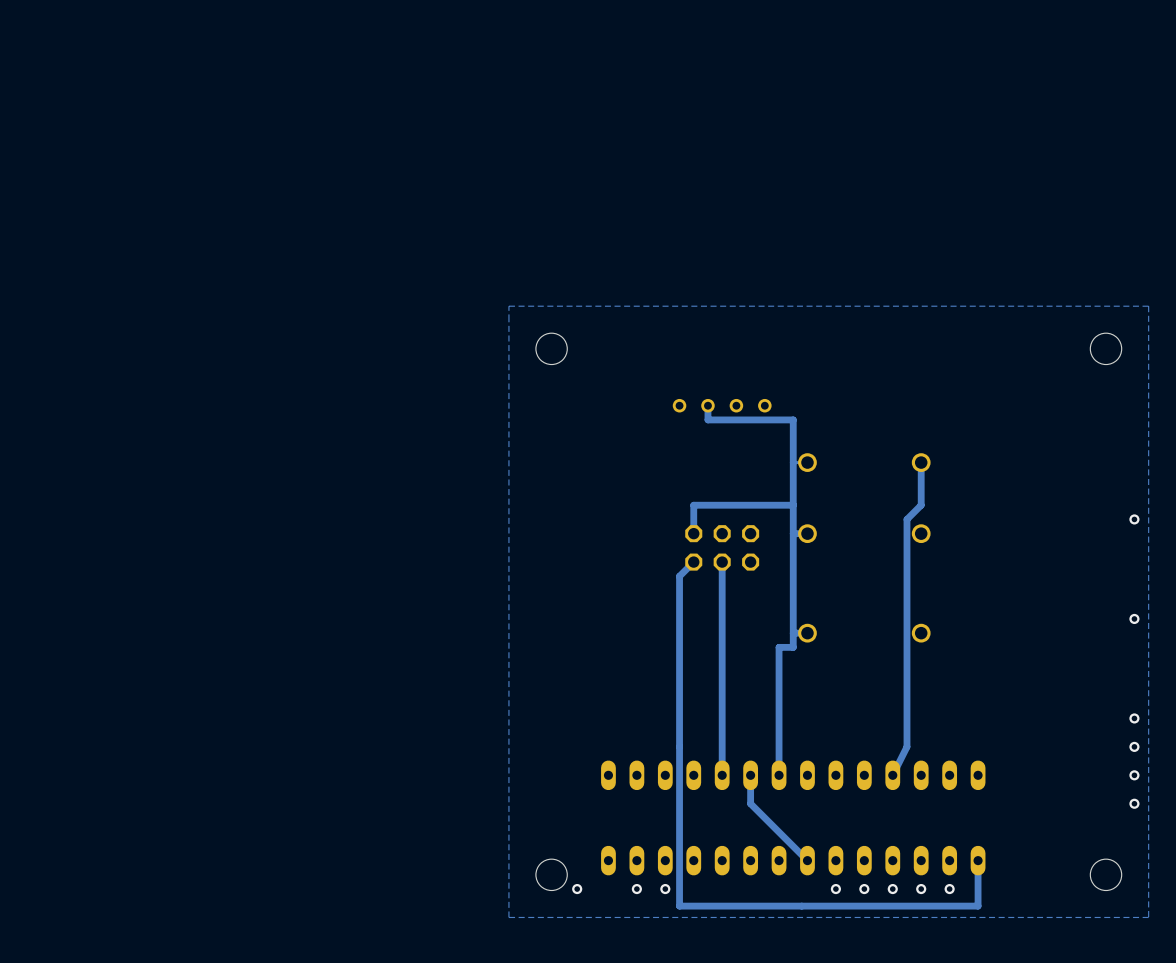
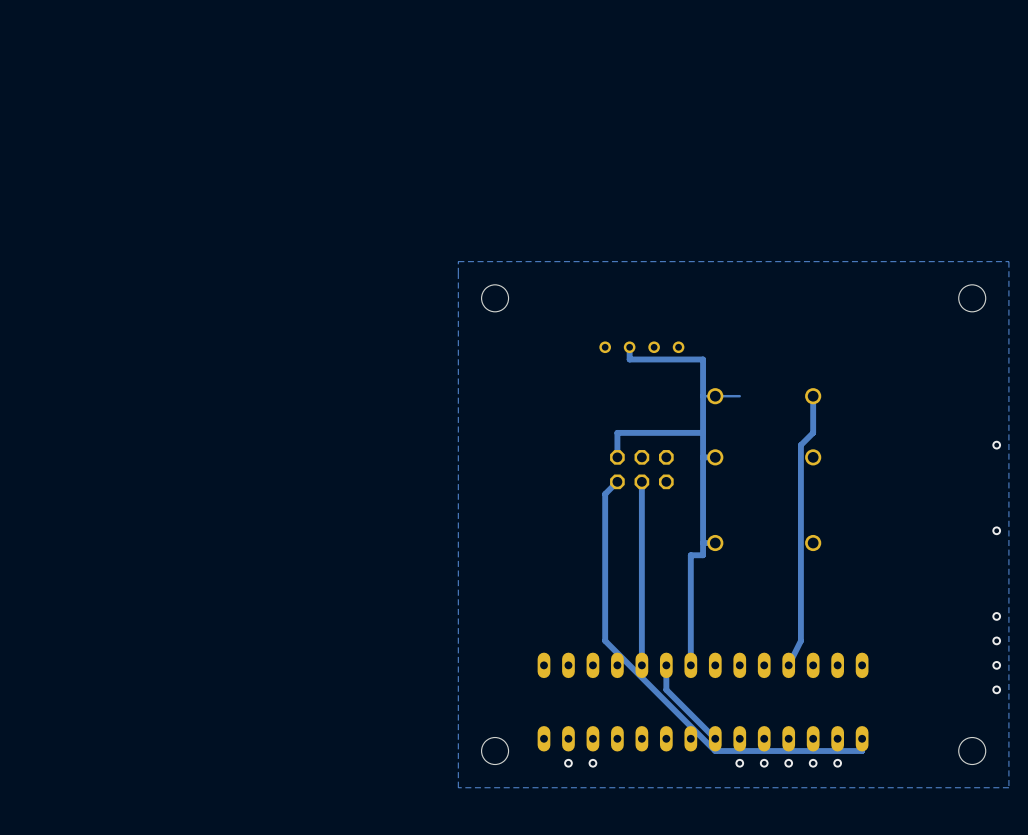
track: none -> (739, 396) (717, 396)
track: (679, 746) (679, 906) (978, 906) (978, 874) -> (605, 640) (715, 751) (862, 751)
via: (577, 889) -> none

